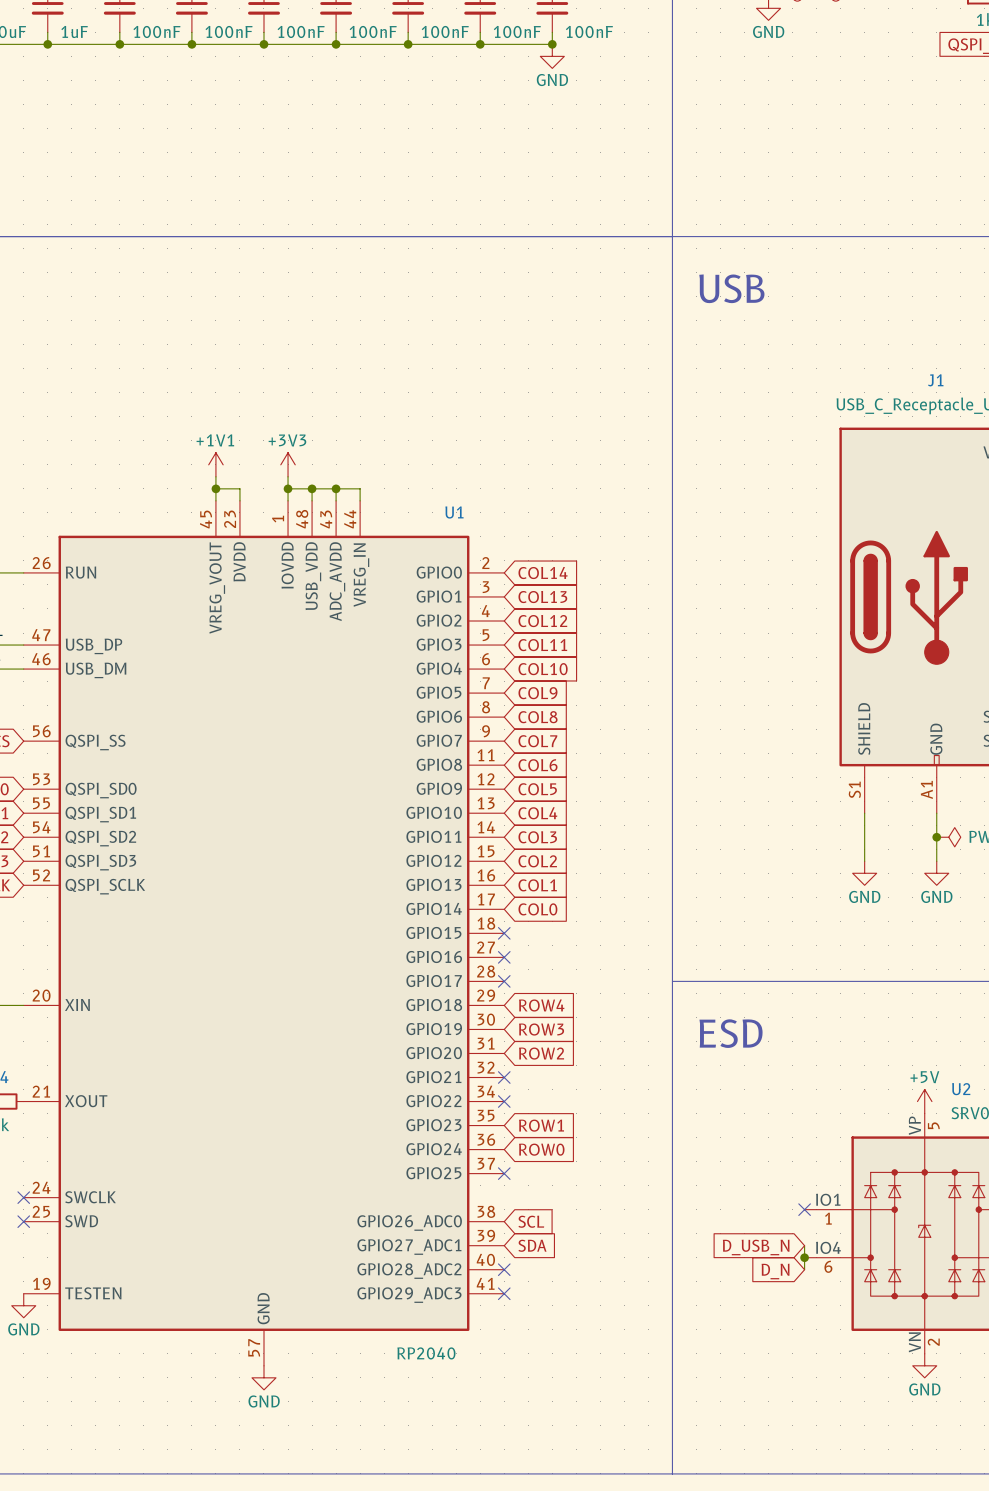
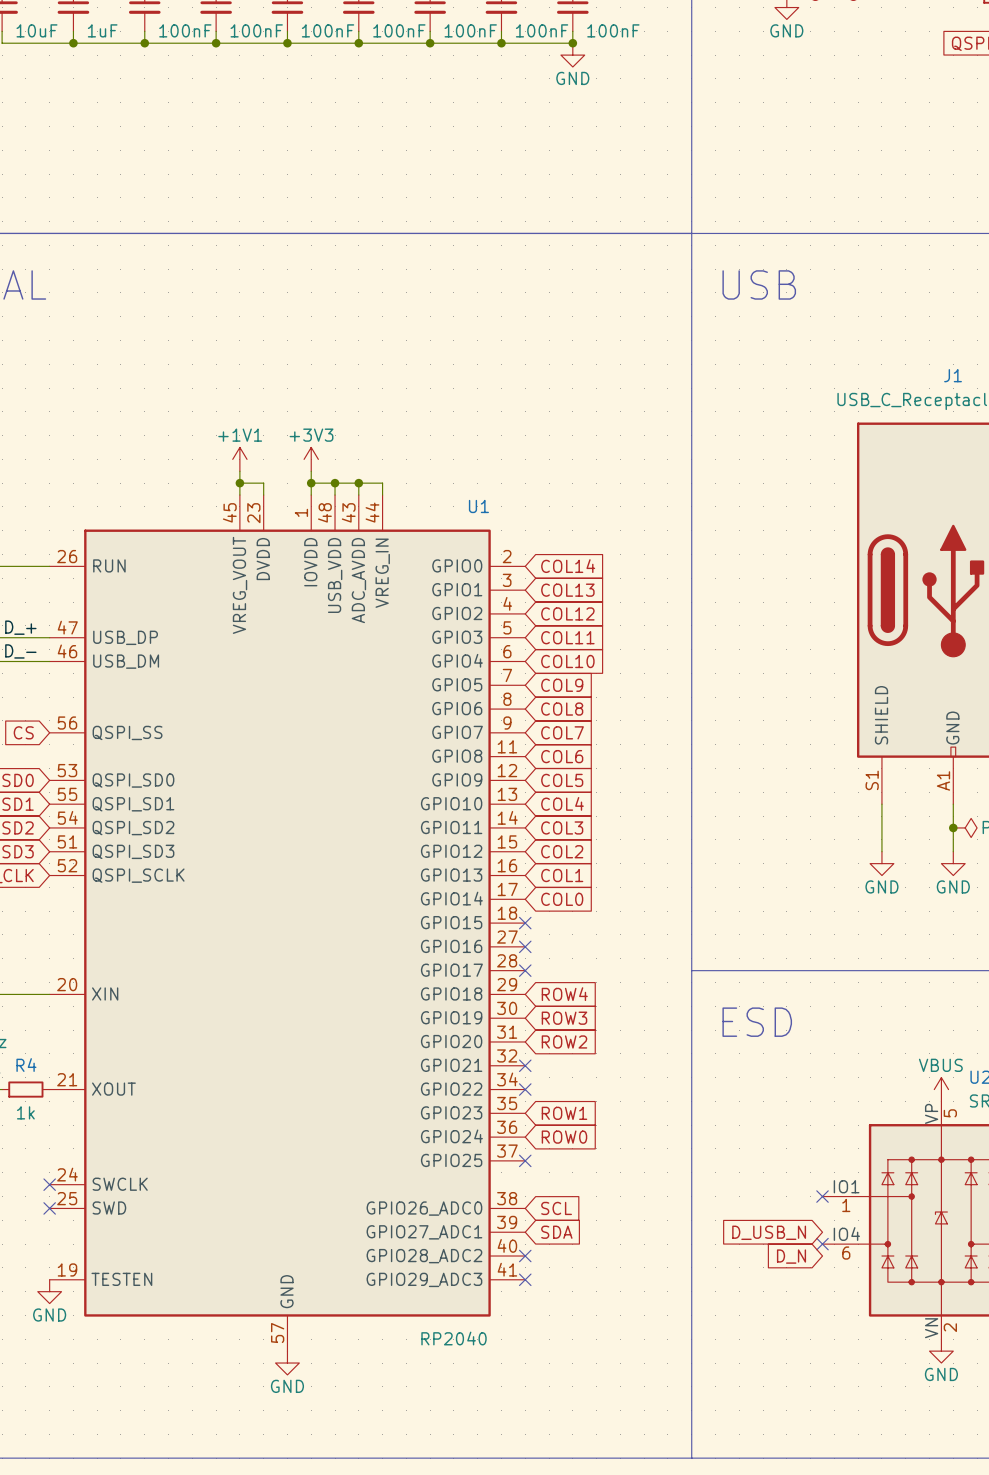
power symbol: +5V (924, 1101) -> VBUS (941, 1089)
wire: (804, 1245) (804, 1269) -> none
junction: (804, 1257) -> none
no-connect mark: none -> (822, 1244)

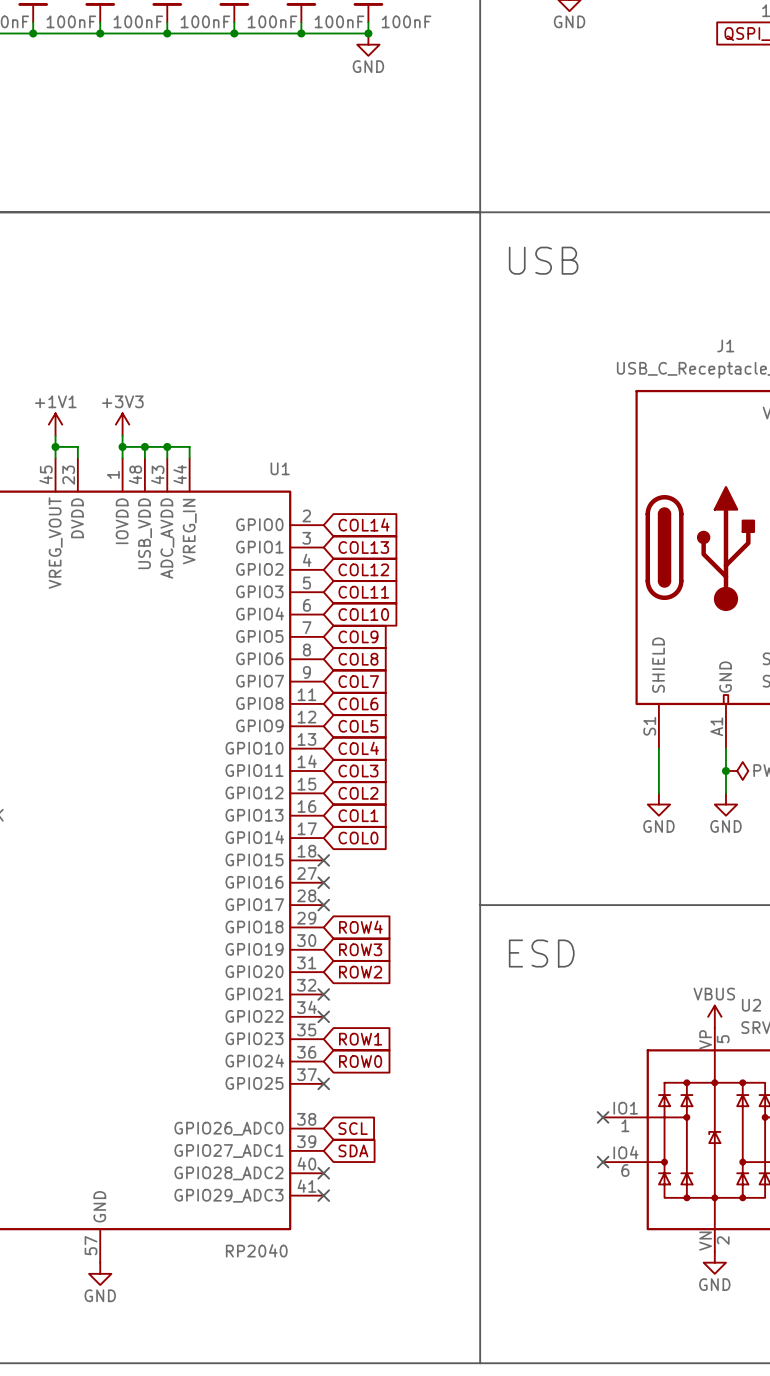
global label: D_USB_N (769, 1232) -> none
global label: D_N (791, 1256) -> none

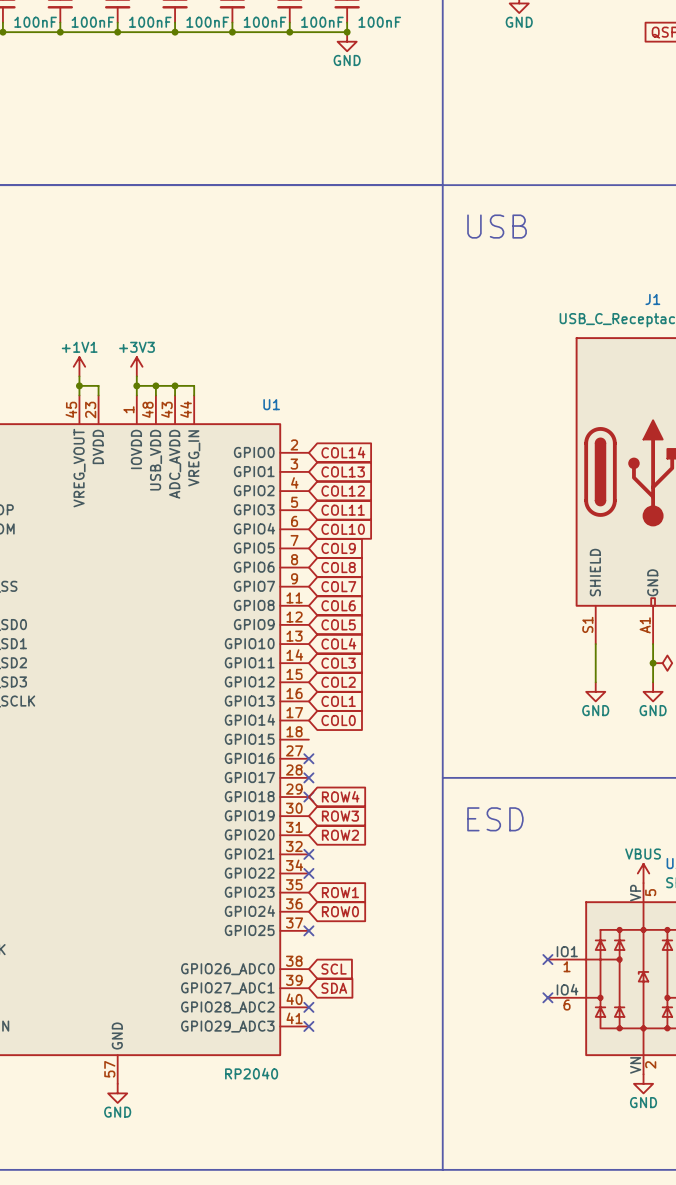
no-connect mark: (323, 860) -> none
no-connect mark: none -> (308, 797)

